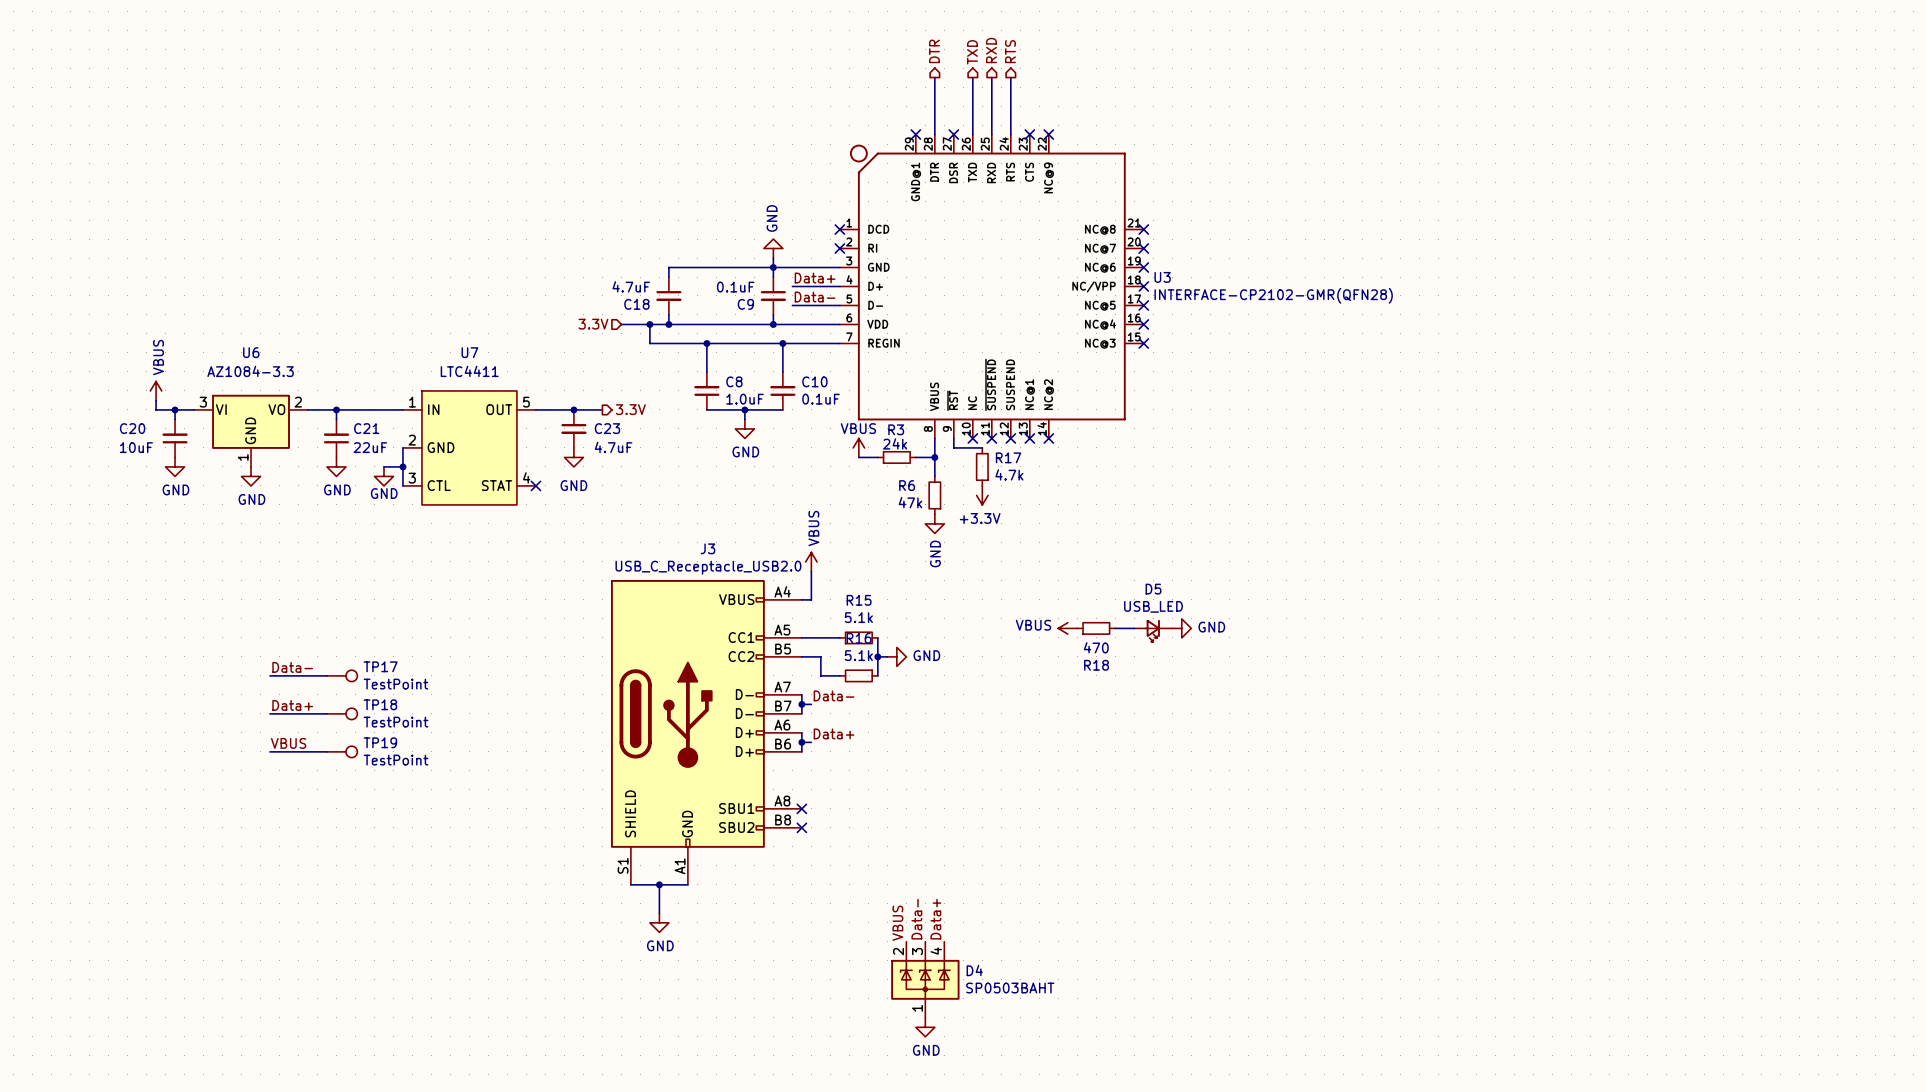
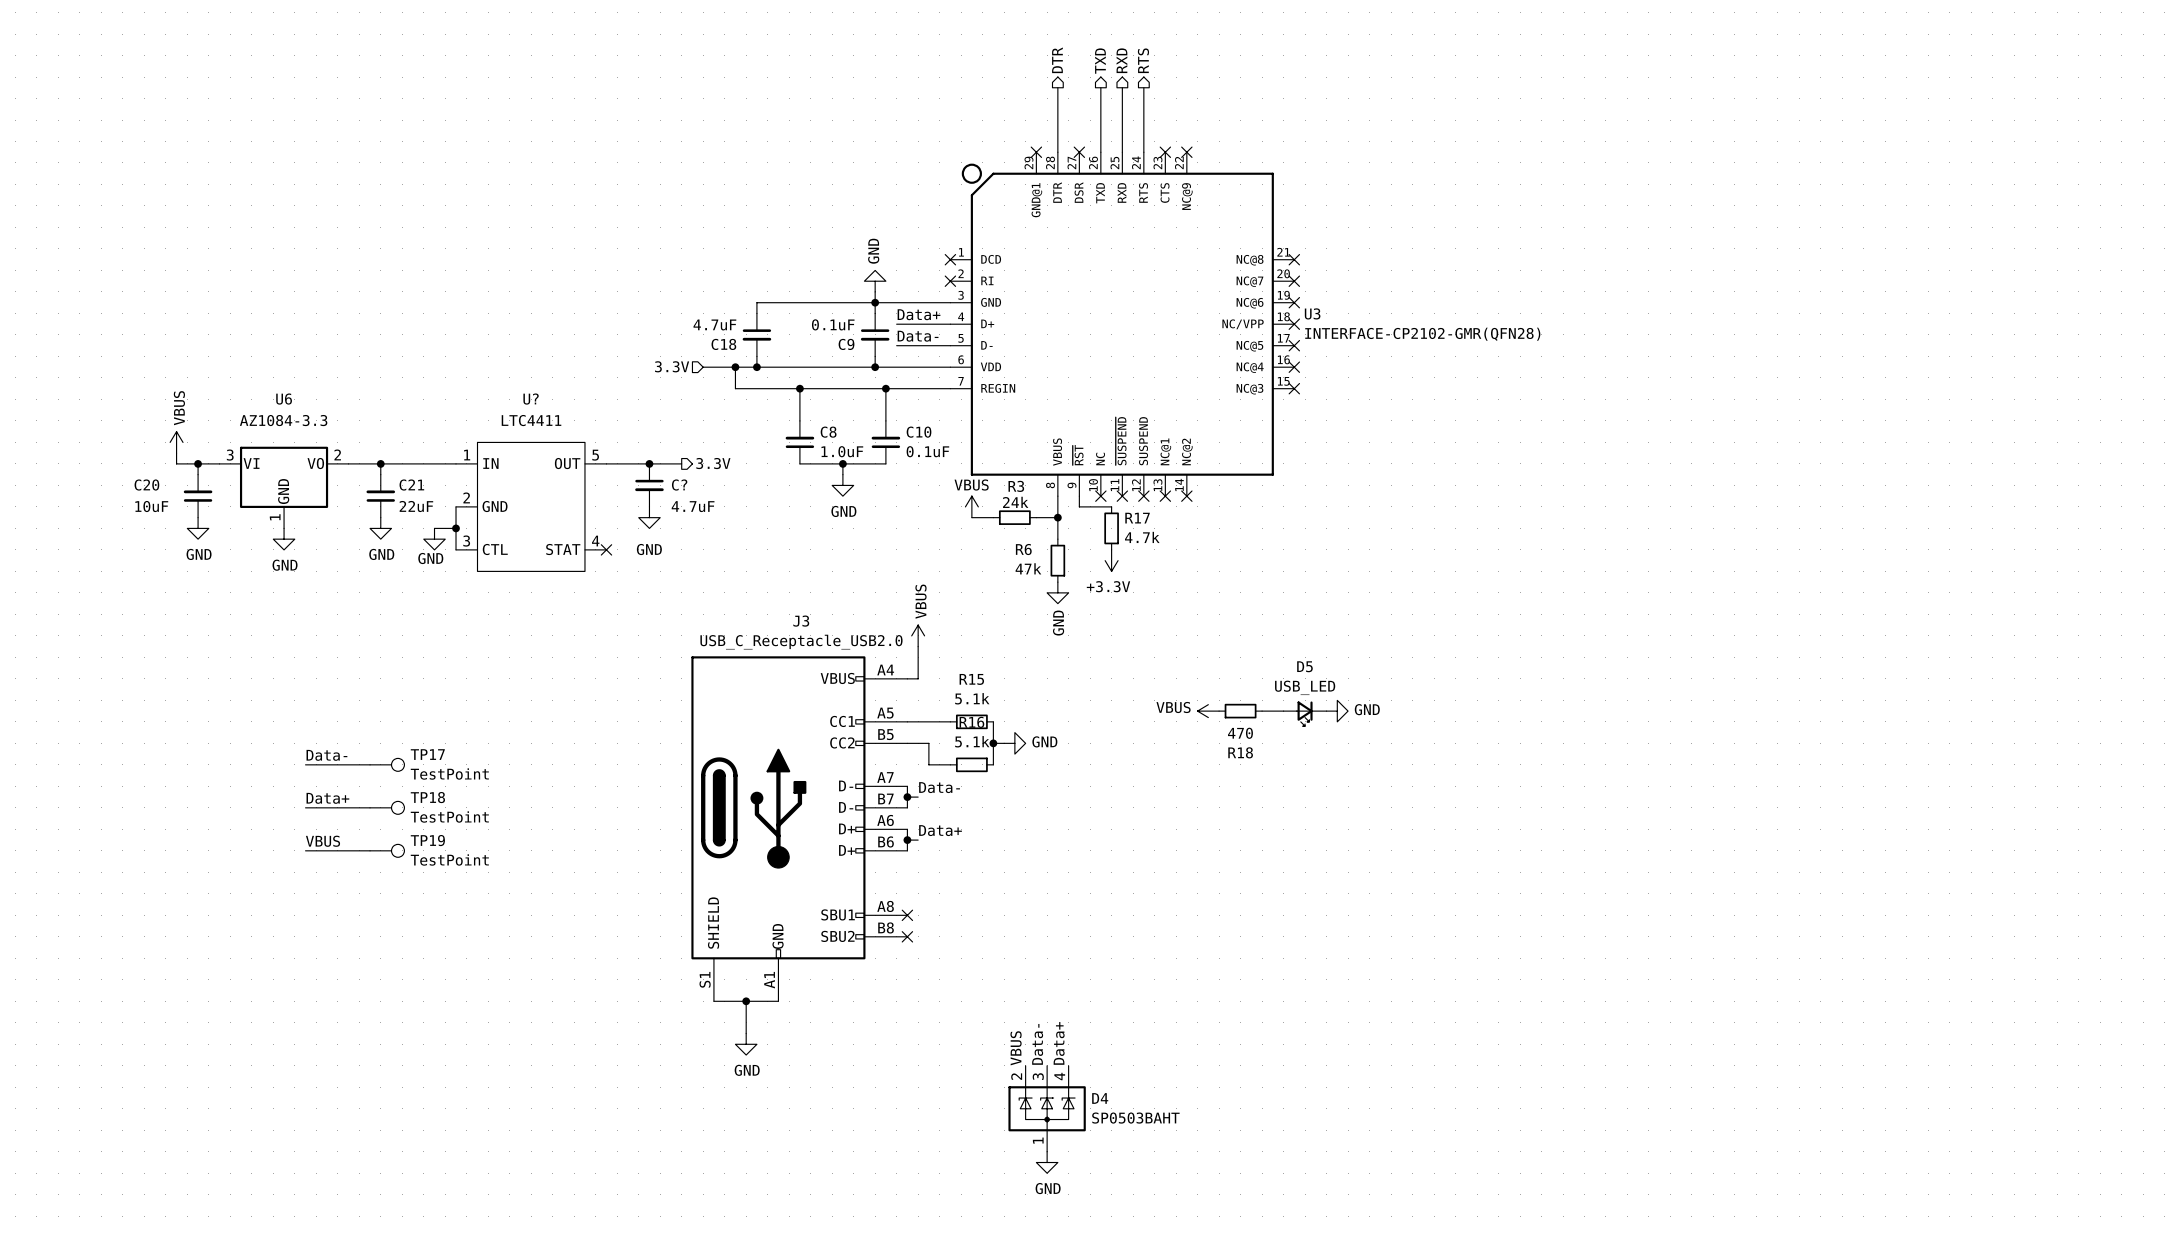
U7 name: U7 (469, 352) -> U? (531, 399)
C23 name: C23 (607, 428) -> C? (679, 485)

